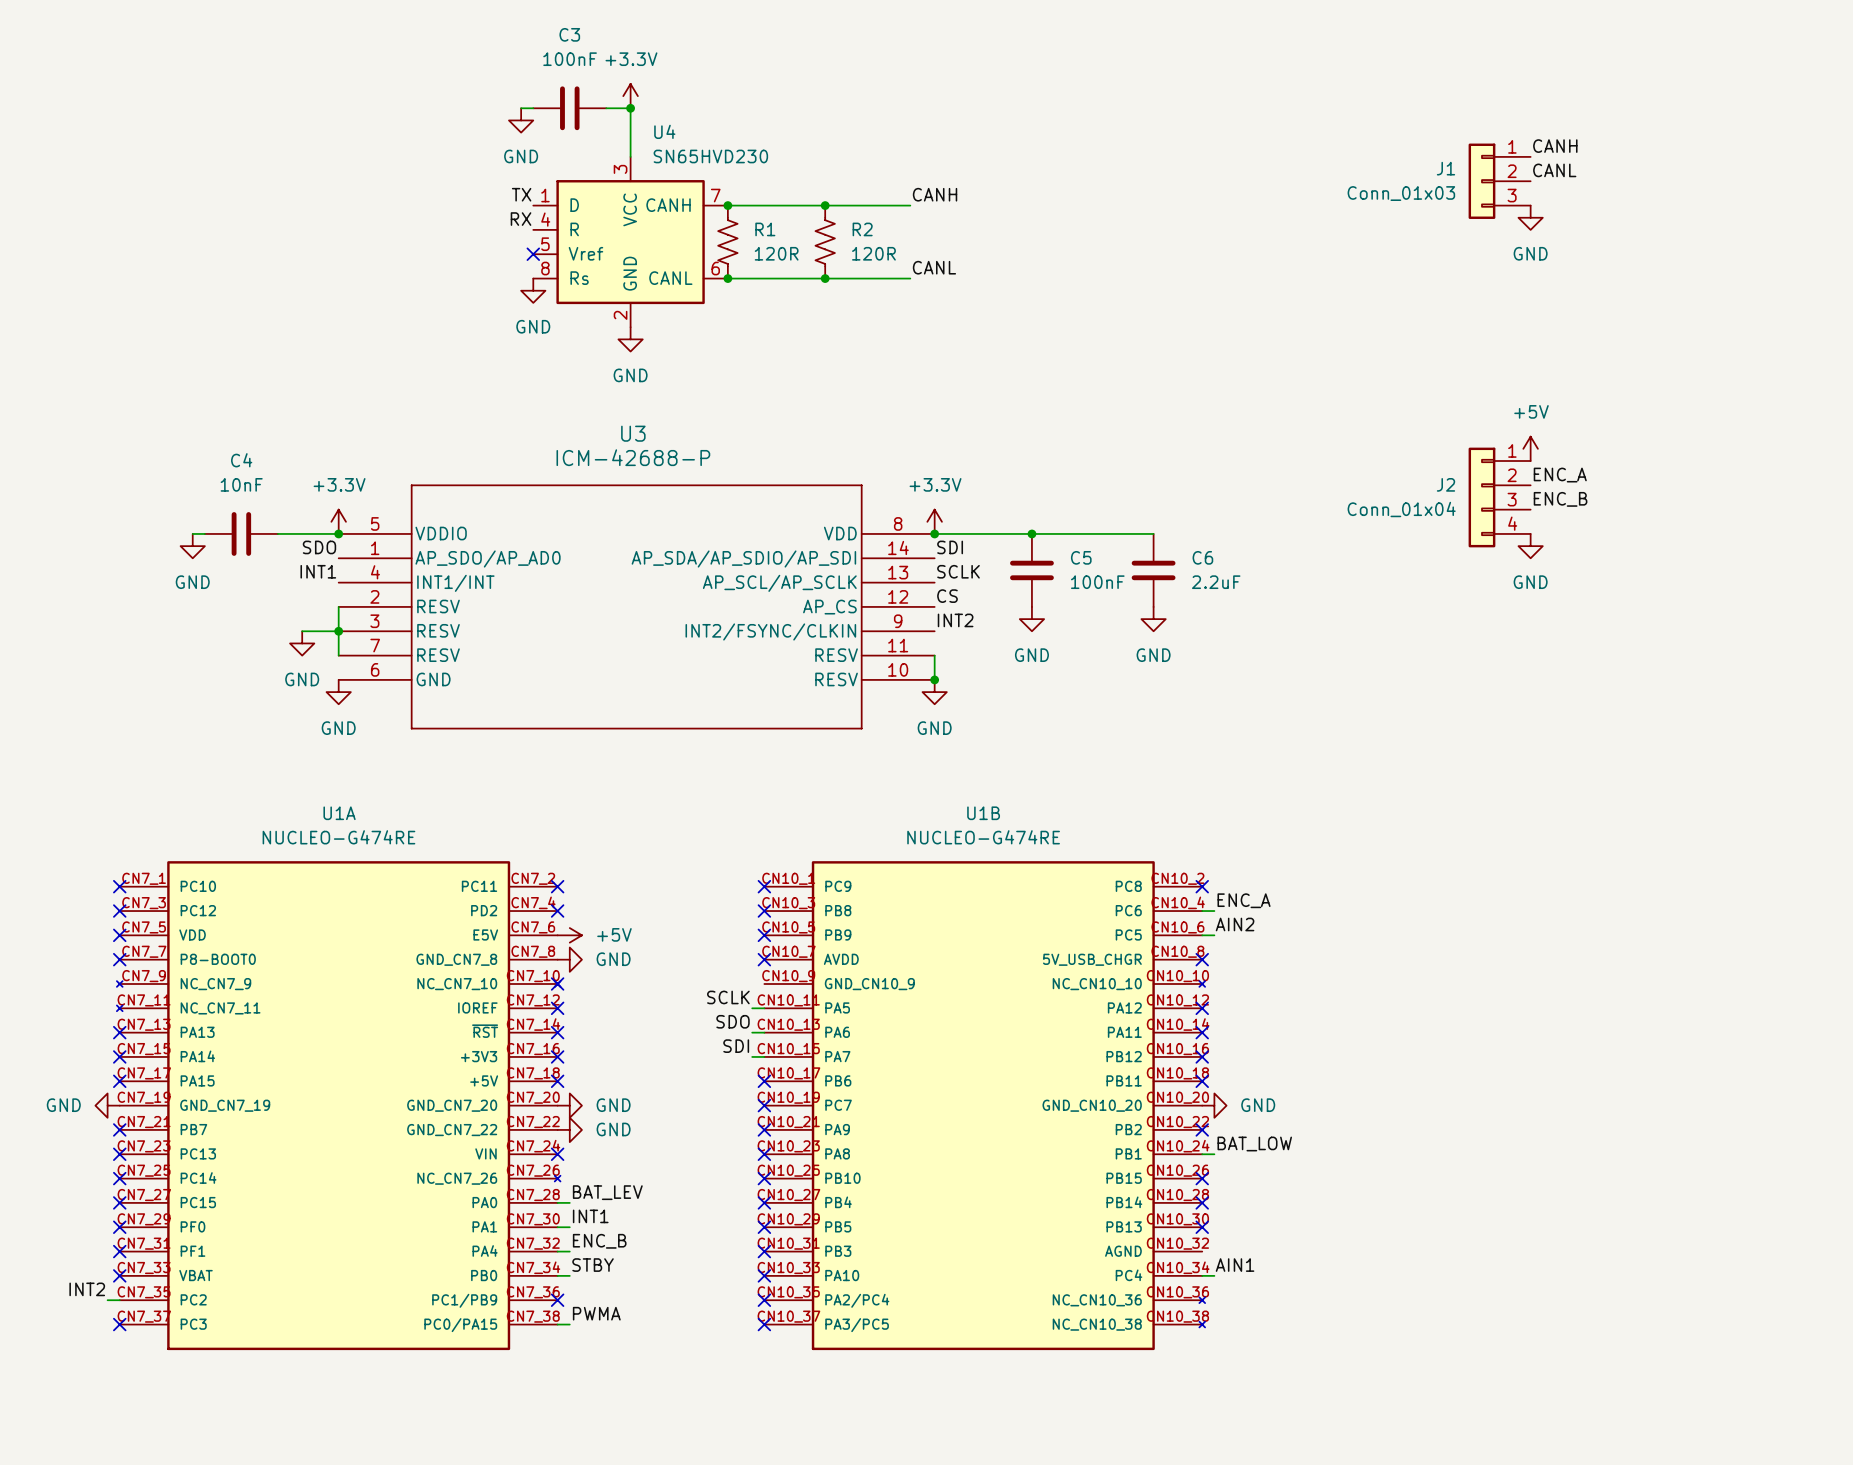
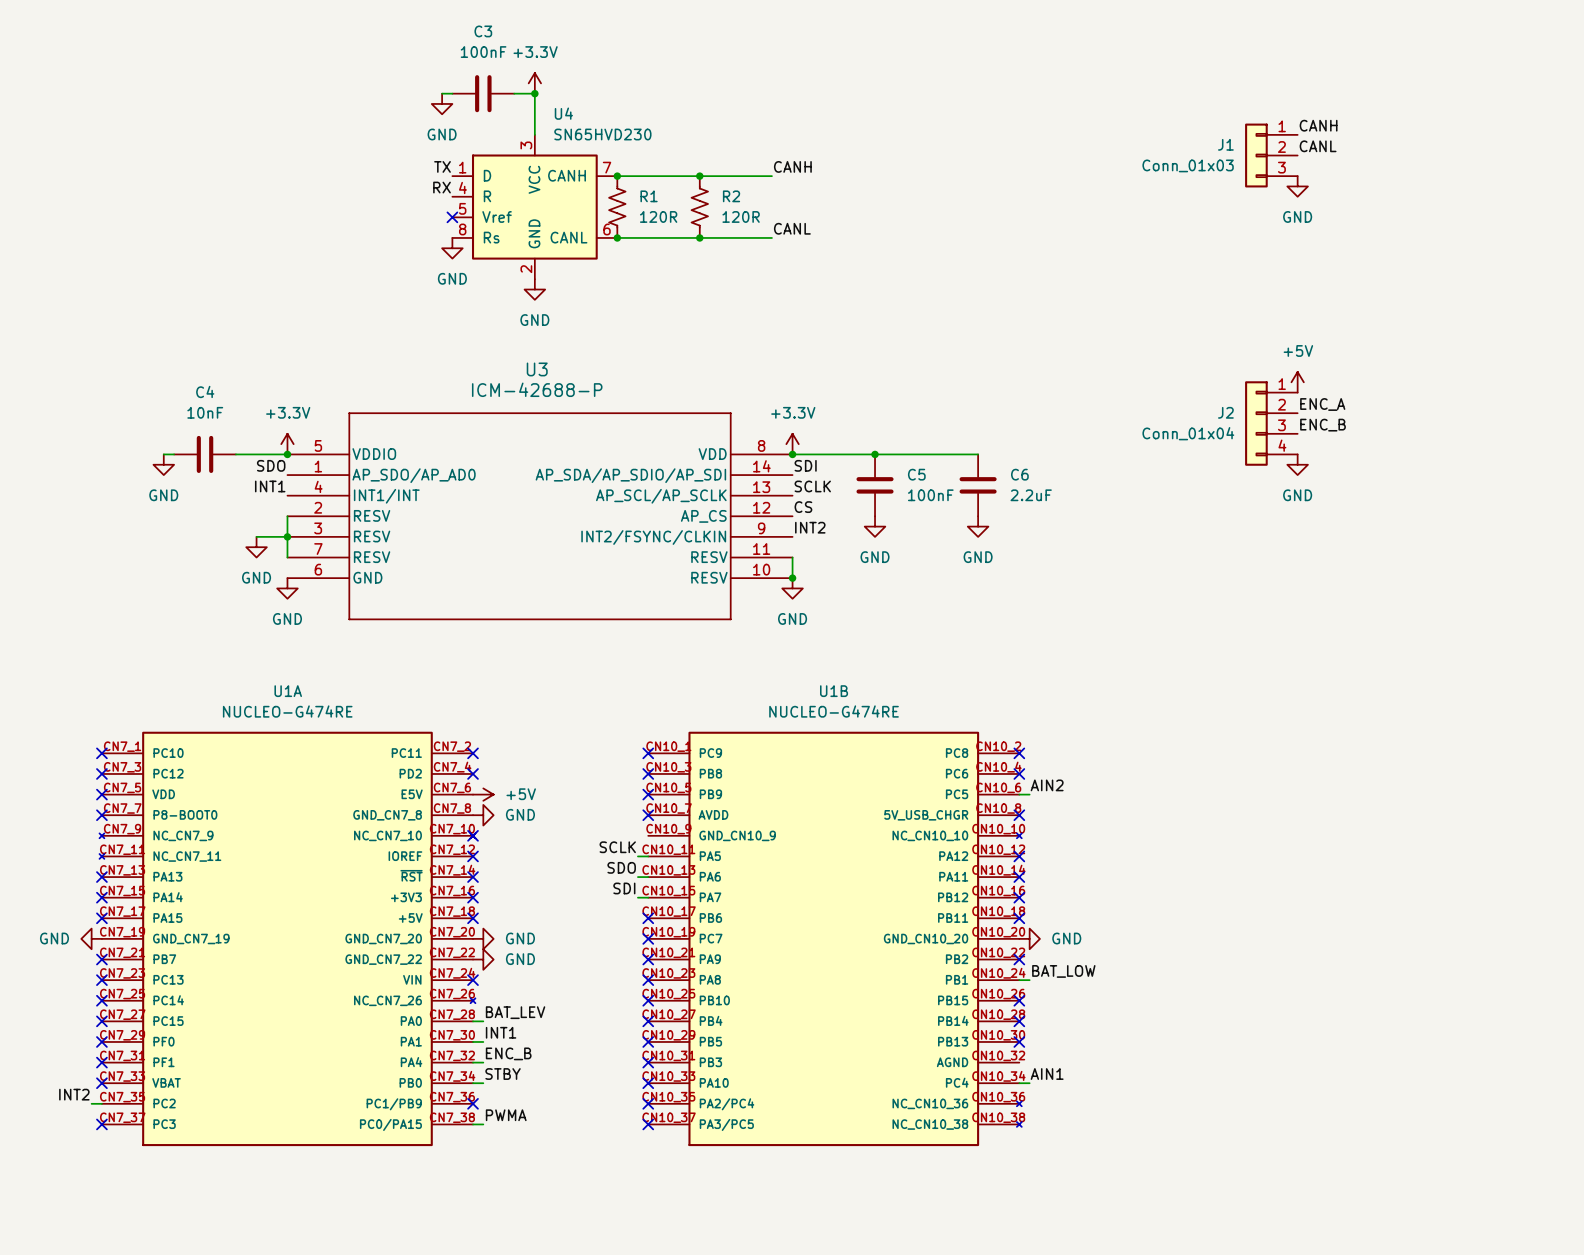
label: ENC_A (1244, 900) -> none
wire: (1202, 911) (1214, 911) -> none
no-connect mark: none -> (1019, 773)

